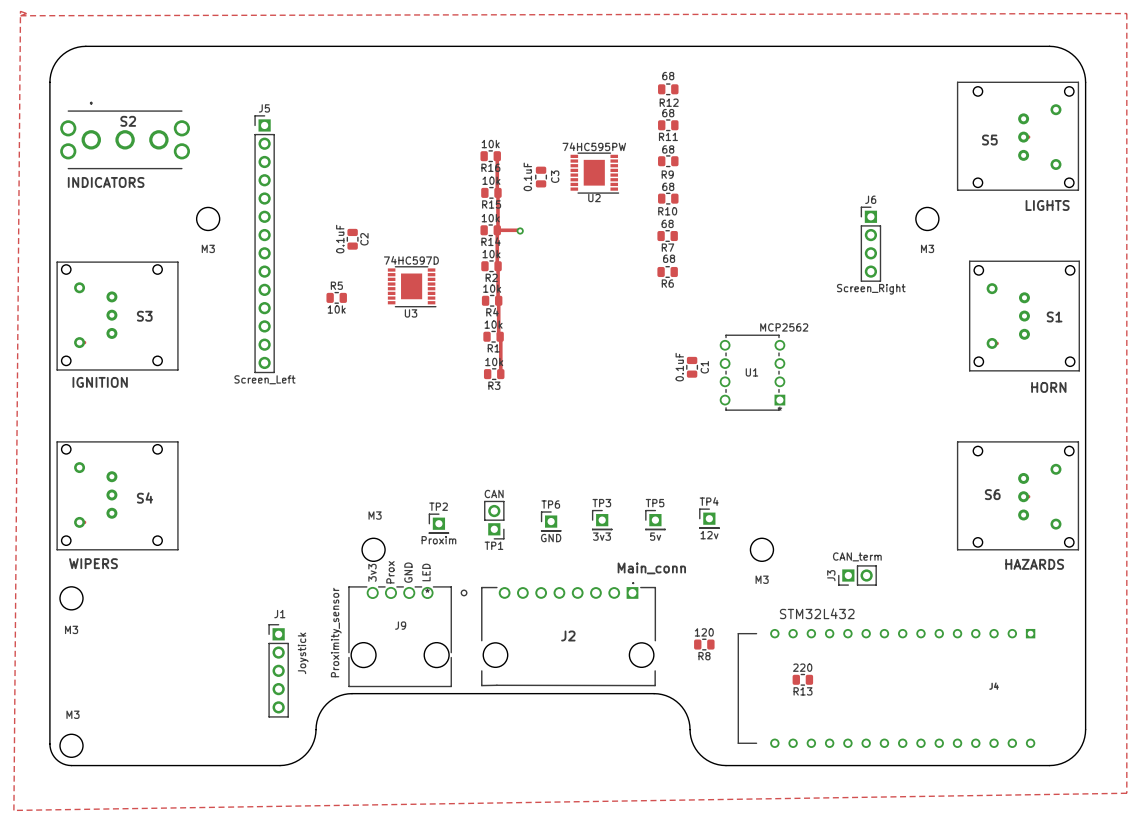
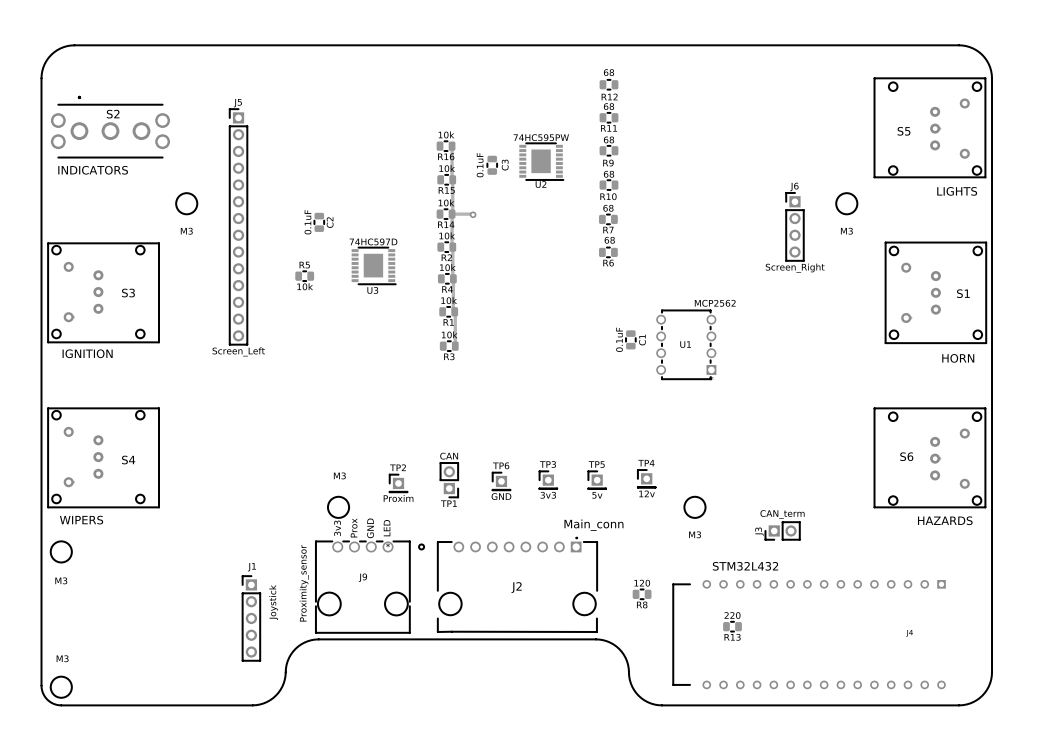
zone outline: (20, 11) (13, 810) (1126, 793) (1126, 13) (20, 15) (26, 13) (20, 11) -> none

